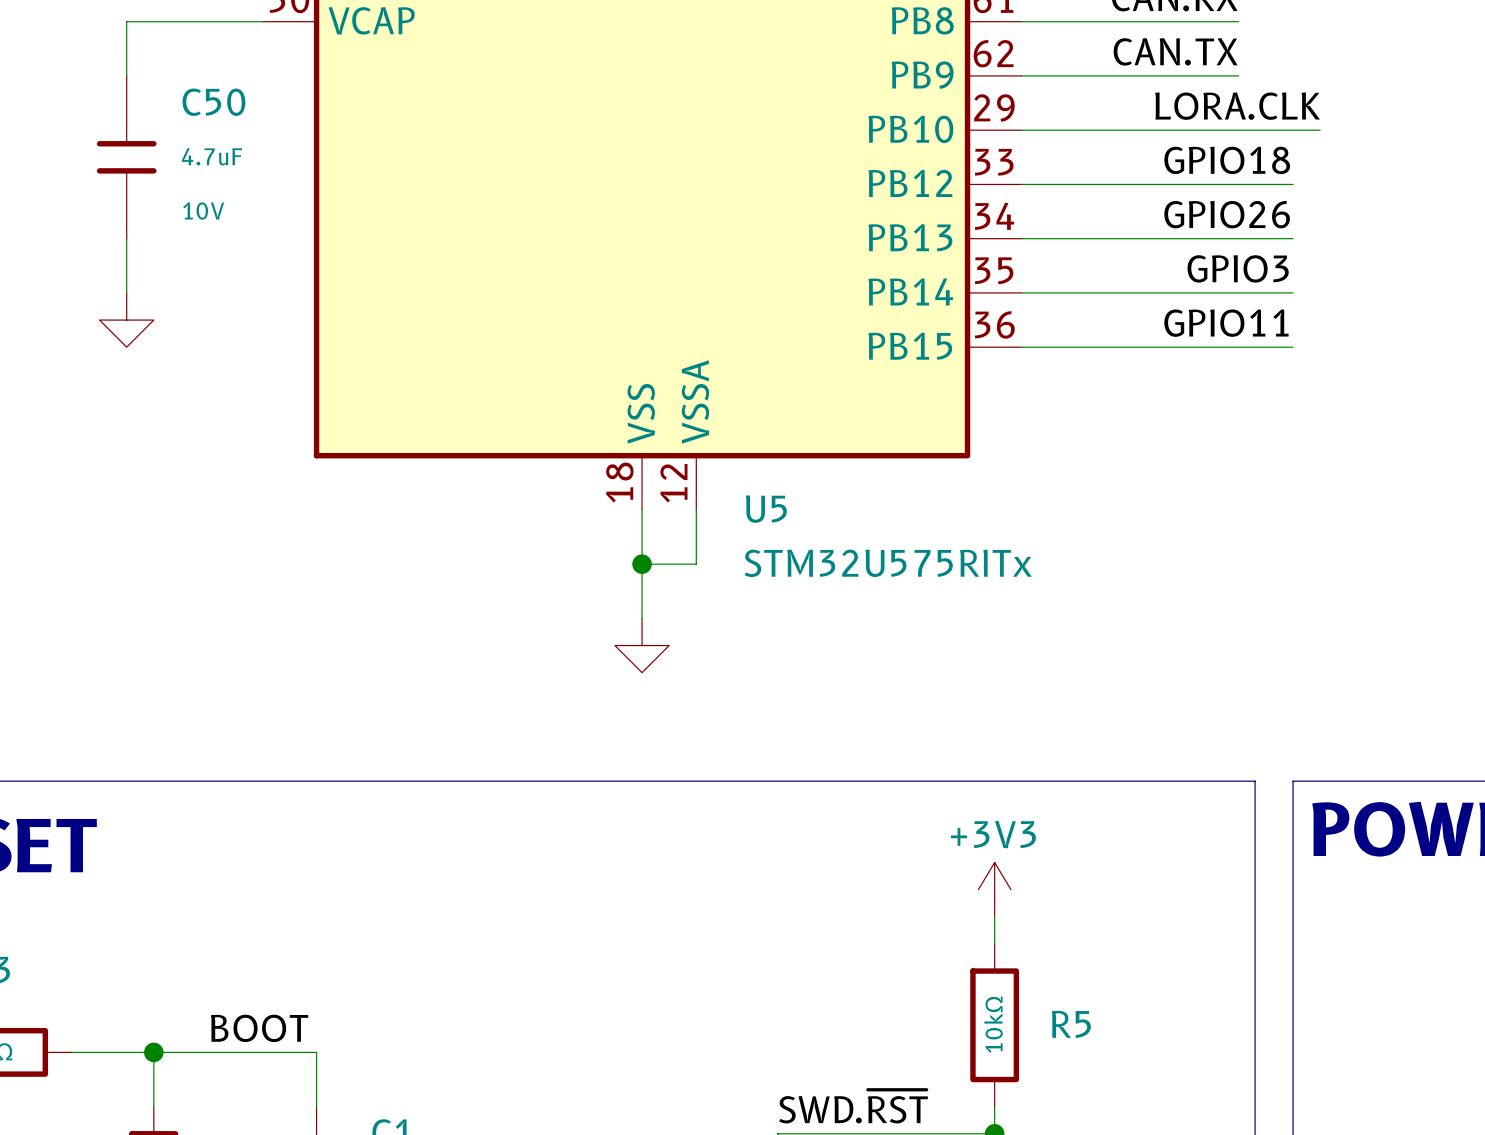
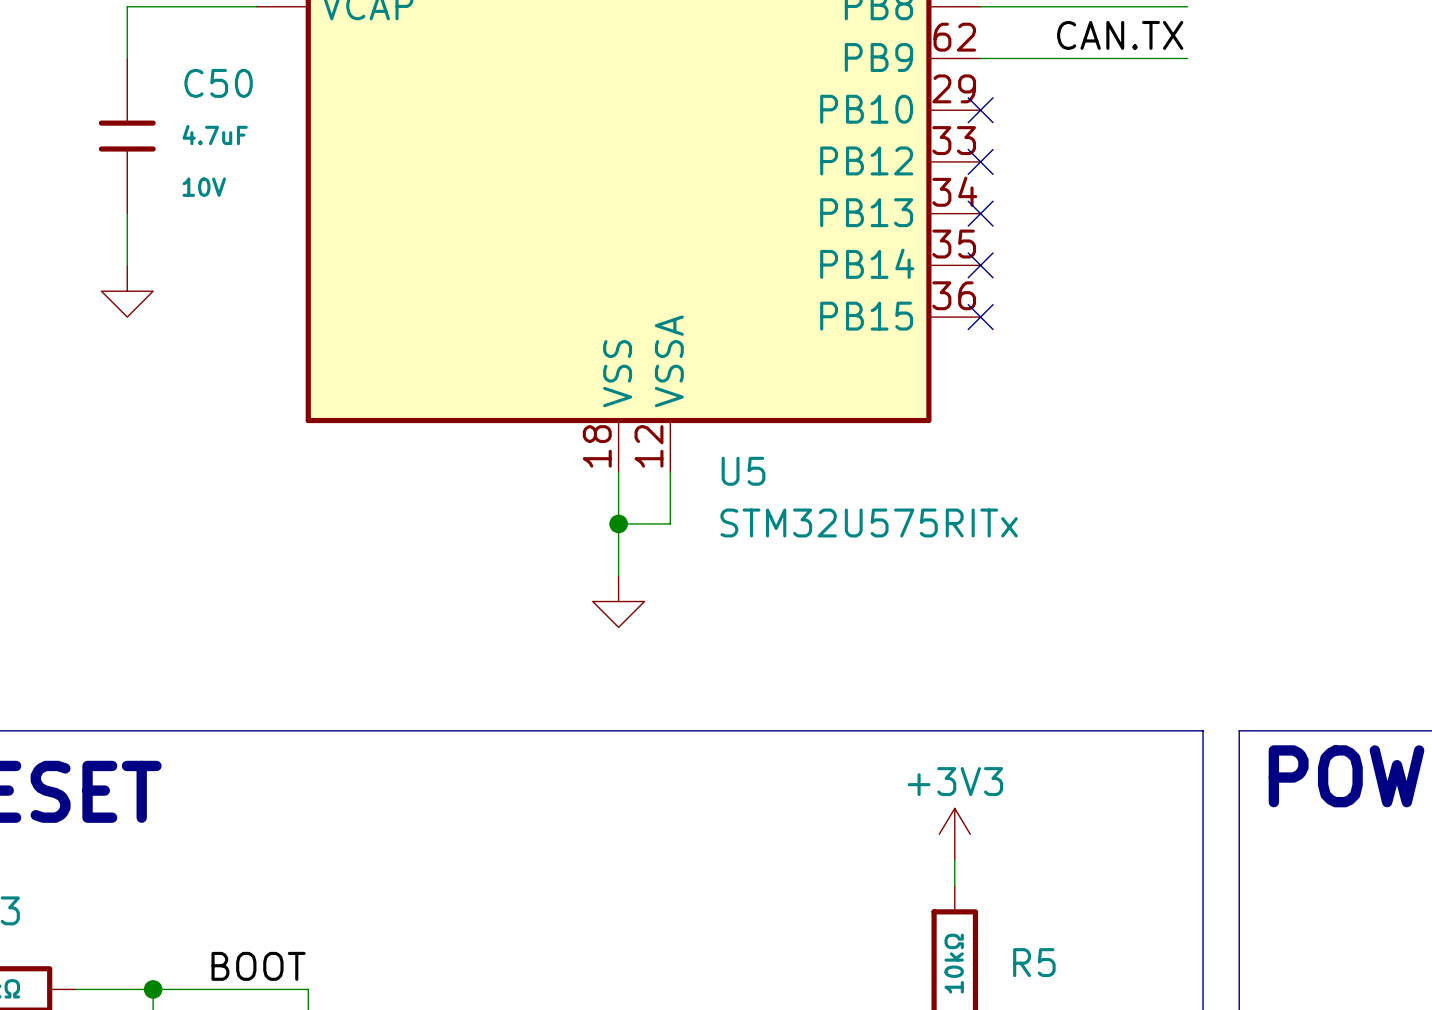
label: LORA.CLK (1237, 106) -> none
wire: (1021, 130) (1320, 130) -> none
no-connect mark: none -> (980, 110)
label: GPIO18 (1227, 160) -> none
wire: (1021, 184) (1293, 184) -> none
no-connect mark: none -> (980, 161)
label: GPIO26 (1227, 214) -> none
wire: (1021, 238) (1293, 238) -> none
no-connect mark: none -> (980, 213)
label: GPIO3 (1238, 268) -> none
wire: (1021, 292) (1293, 292) -> none
no-connect mark: none -> (980, 265)
label: GPIO11 (1226, 323) -> none
wire: (1021, 347) (1293, 347) -> none
no-connect mark: none -> (980, 317)

